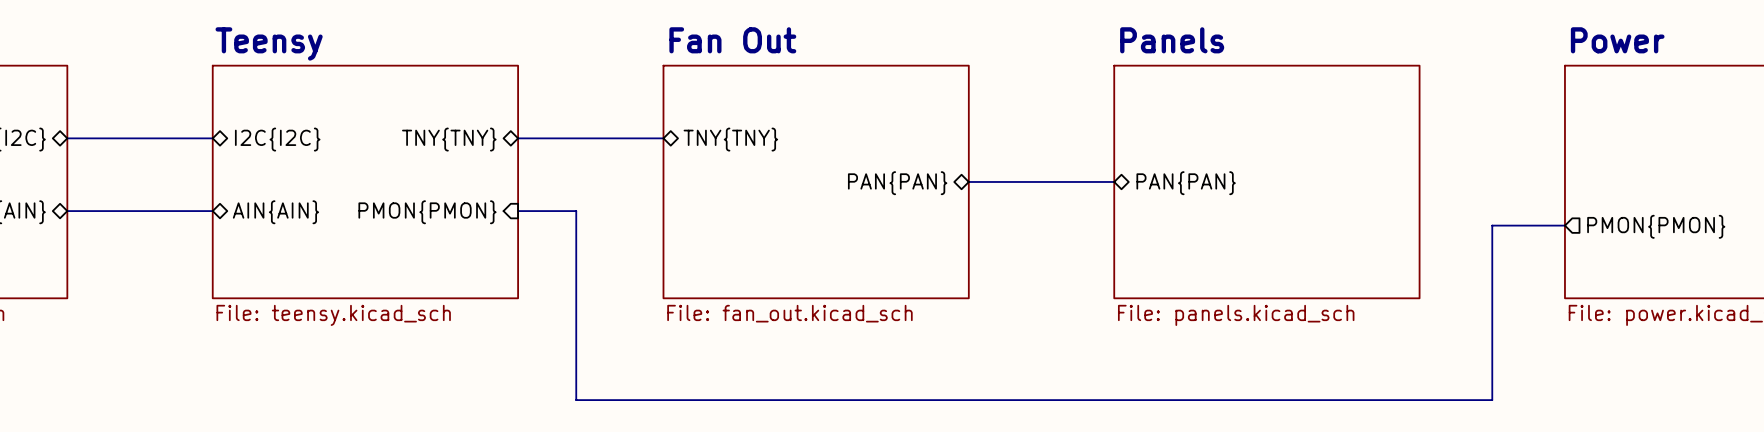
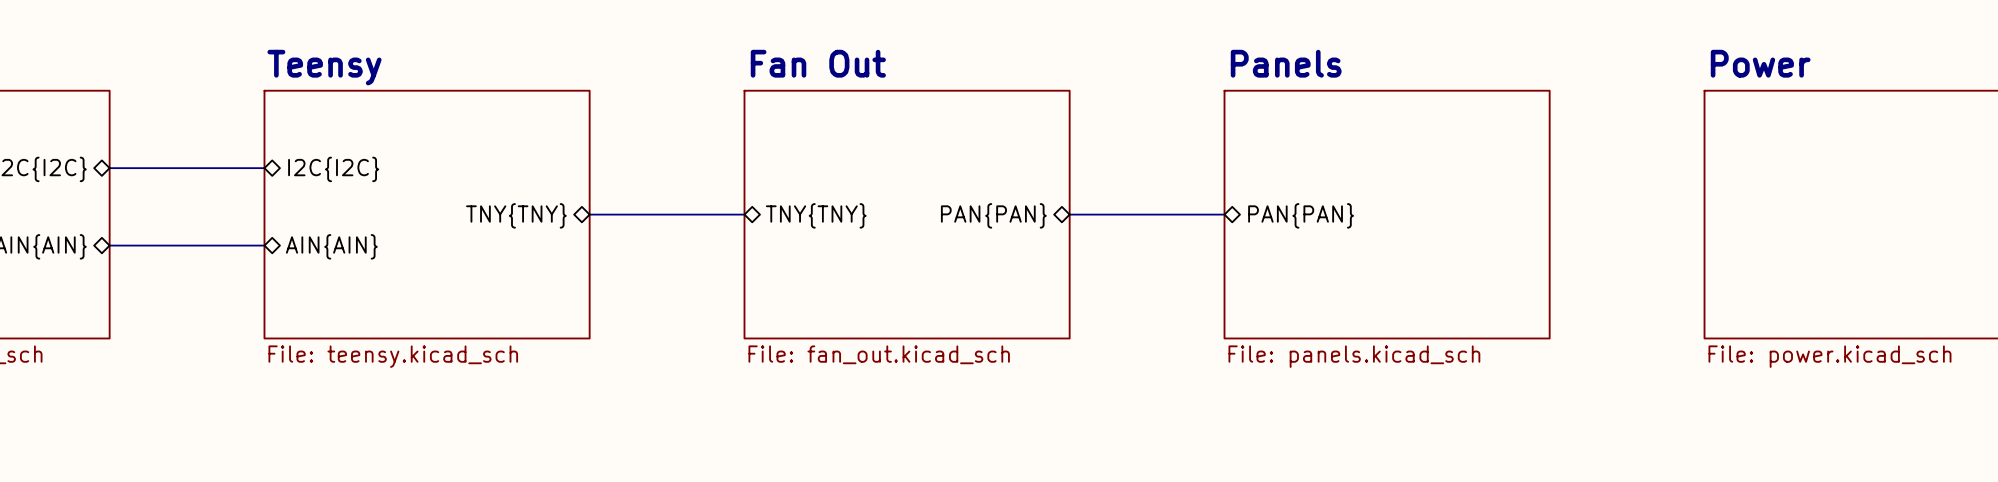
bus: (518, 138) (663, 138) -> (589, 214) (744, 214)
sheet pin position: TNY{TNY} (449, 139) -> TNY{TNY} (516, 215)
sheet pin position: TNY{TNY} (730, 139) -> TNY{TNY} (816, 215)
bus: (518, 211) (576, 211) (576, 400) (1492, 400) (1492, 225) (1564, 225) -> none
sheet pin: PMON{PMON} (427, 212) -> none
sheet pin: PMON{PMON} (1656, 226) -> none

